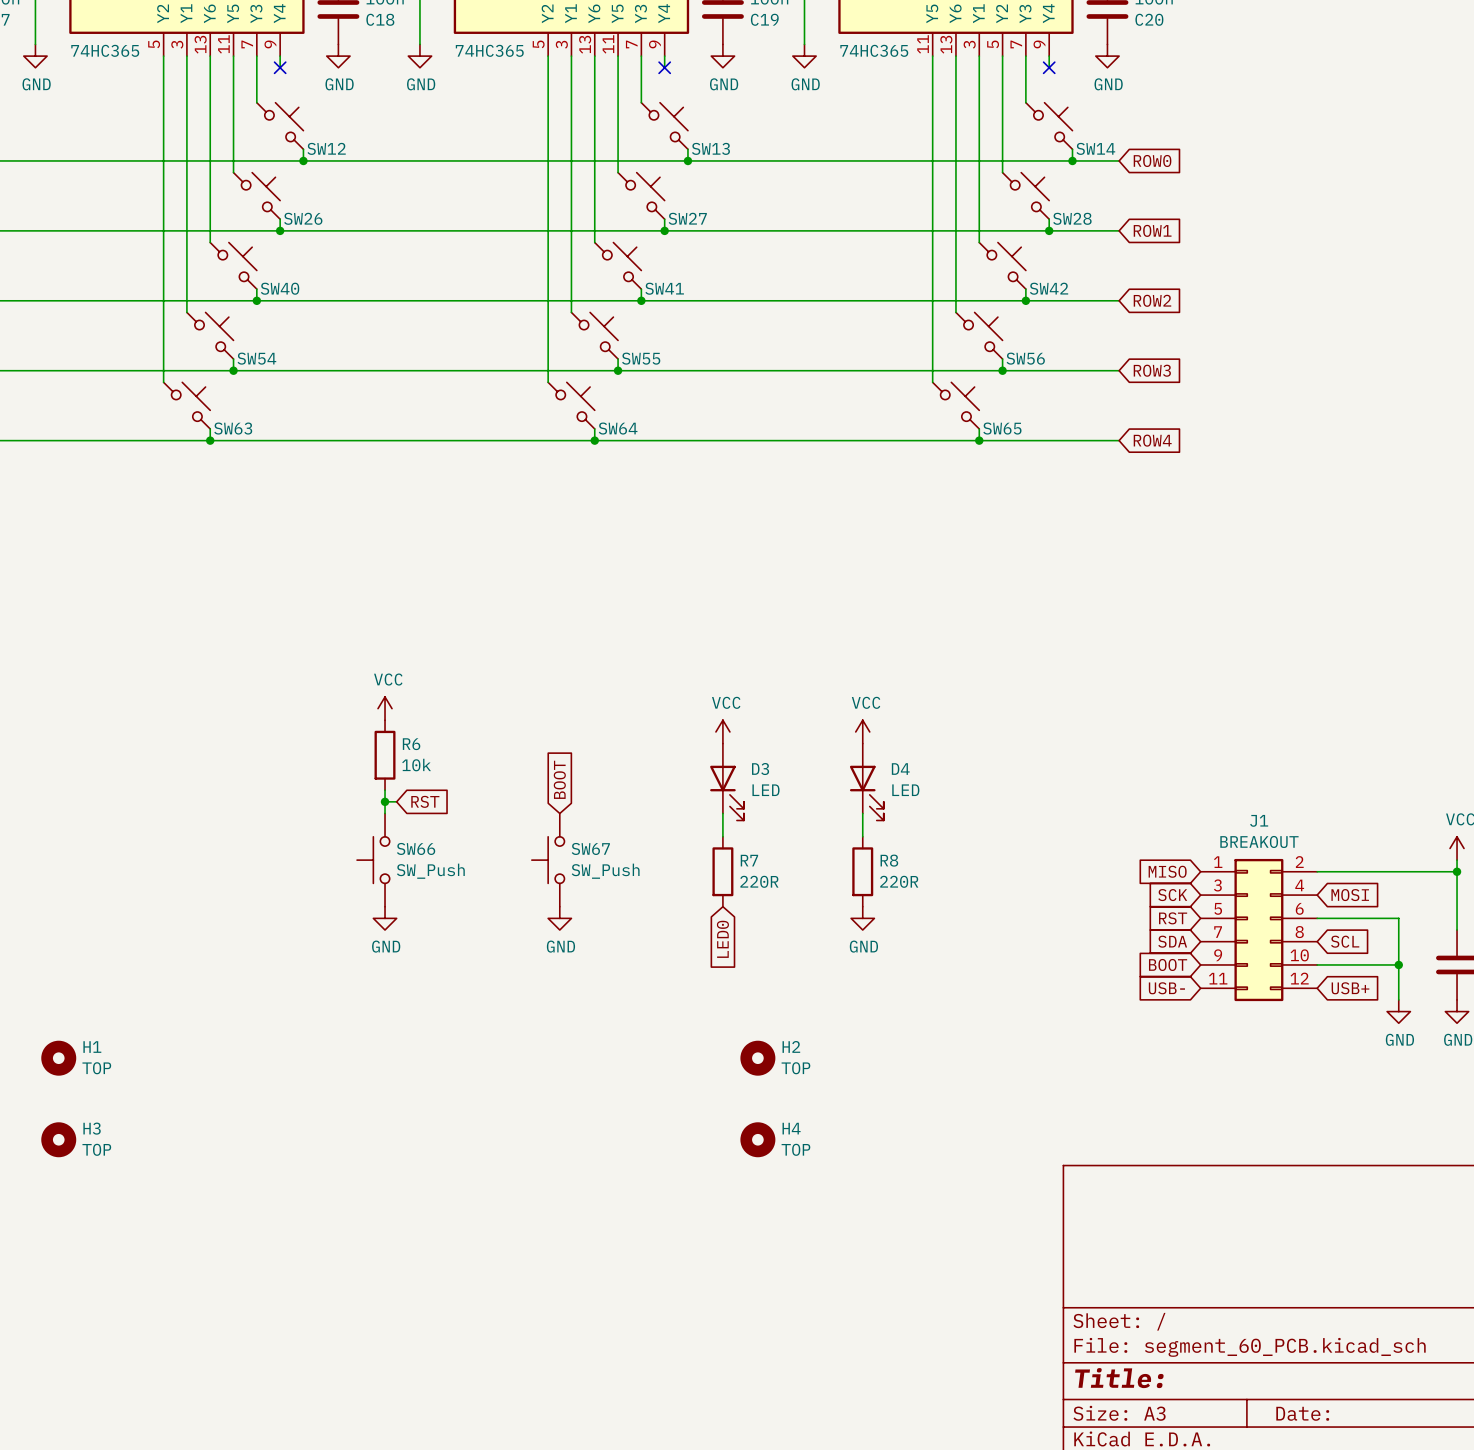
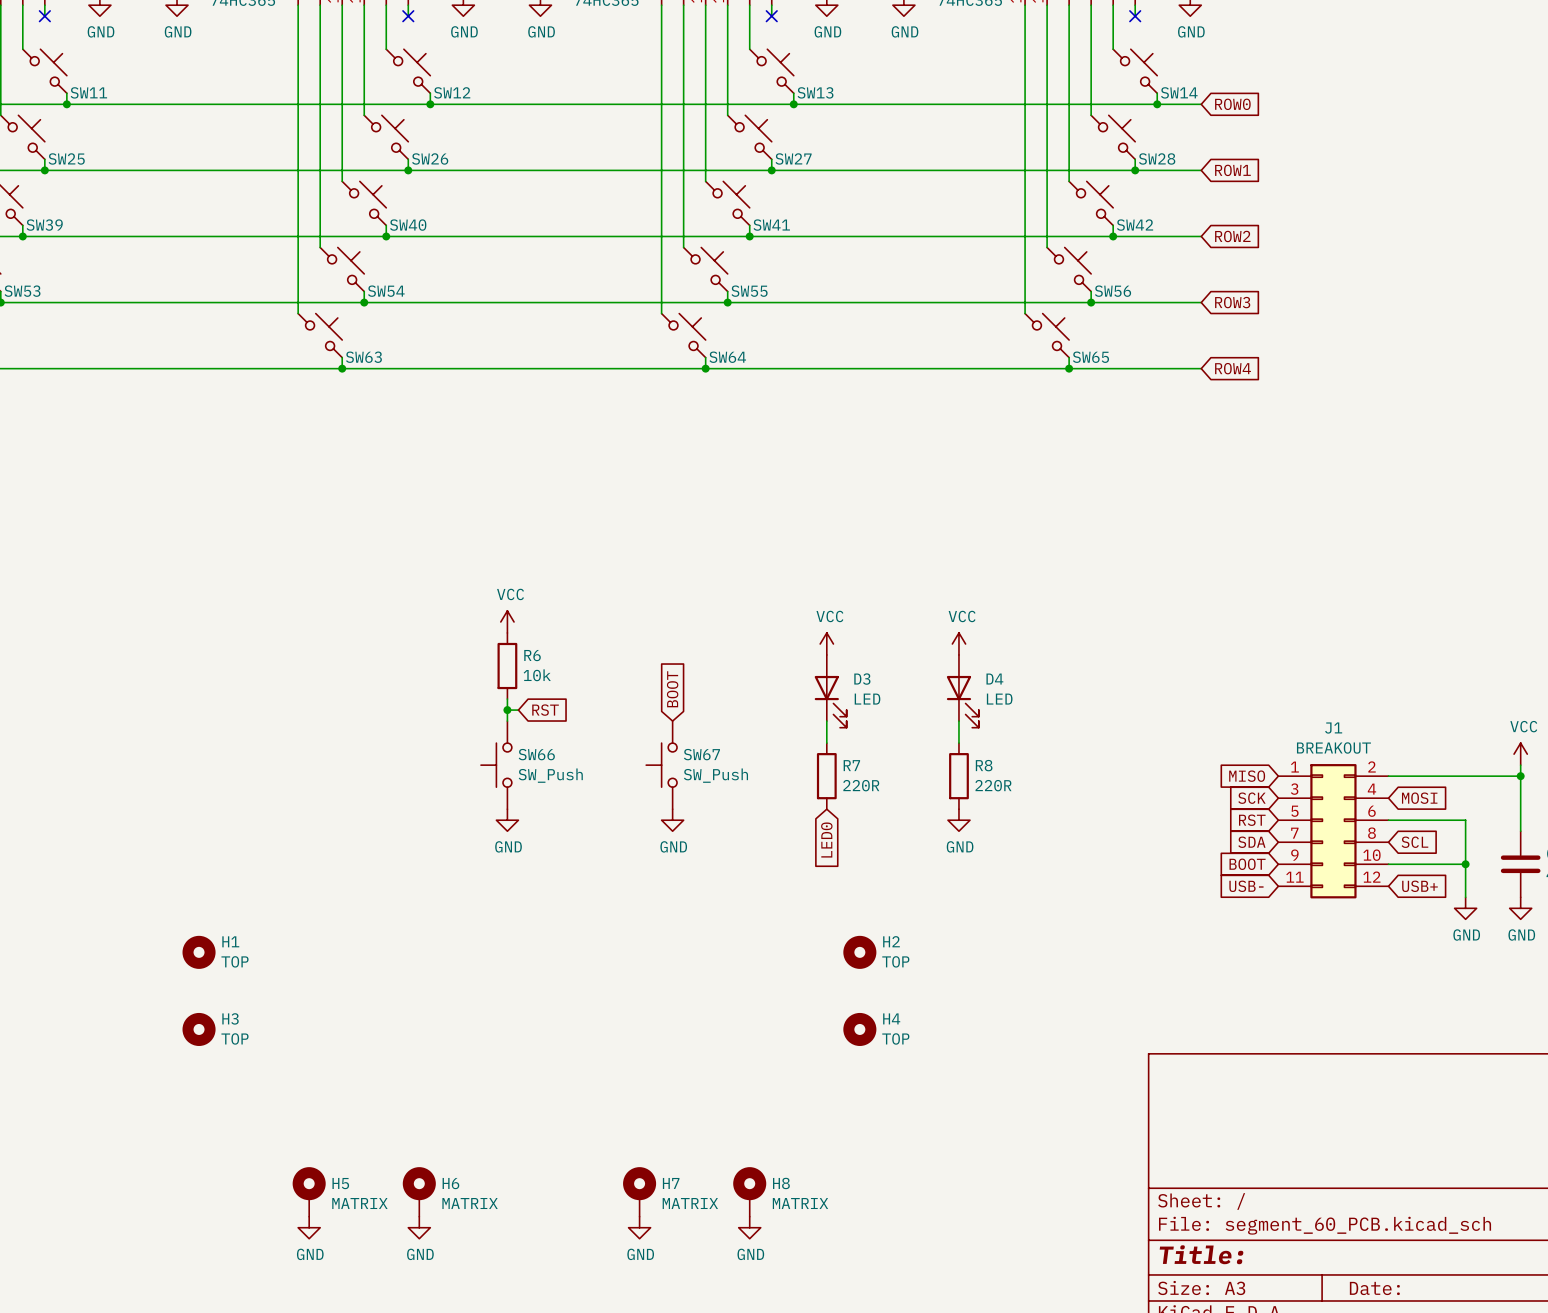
H5: none -> MATRIX (309, 1191)
H6: none -> MATRIX (419, 1191)
H7: none -> MATRIX (639, 1191)
H8: none -> MATRIX (749, 1191)
power symbol: none -> GND (309, 1227)
power symbol: none -> GND (419, 1227)
power symbol: none -> GND (639, 1227)
power symbol: none -> GND (749, 1227)

